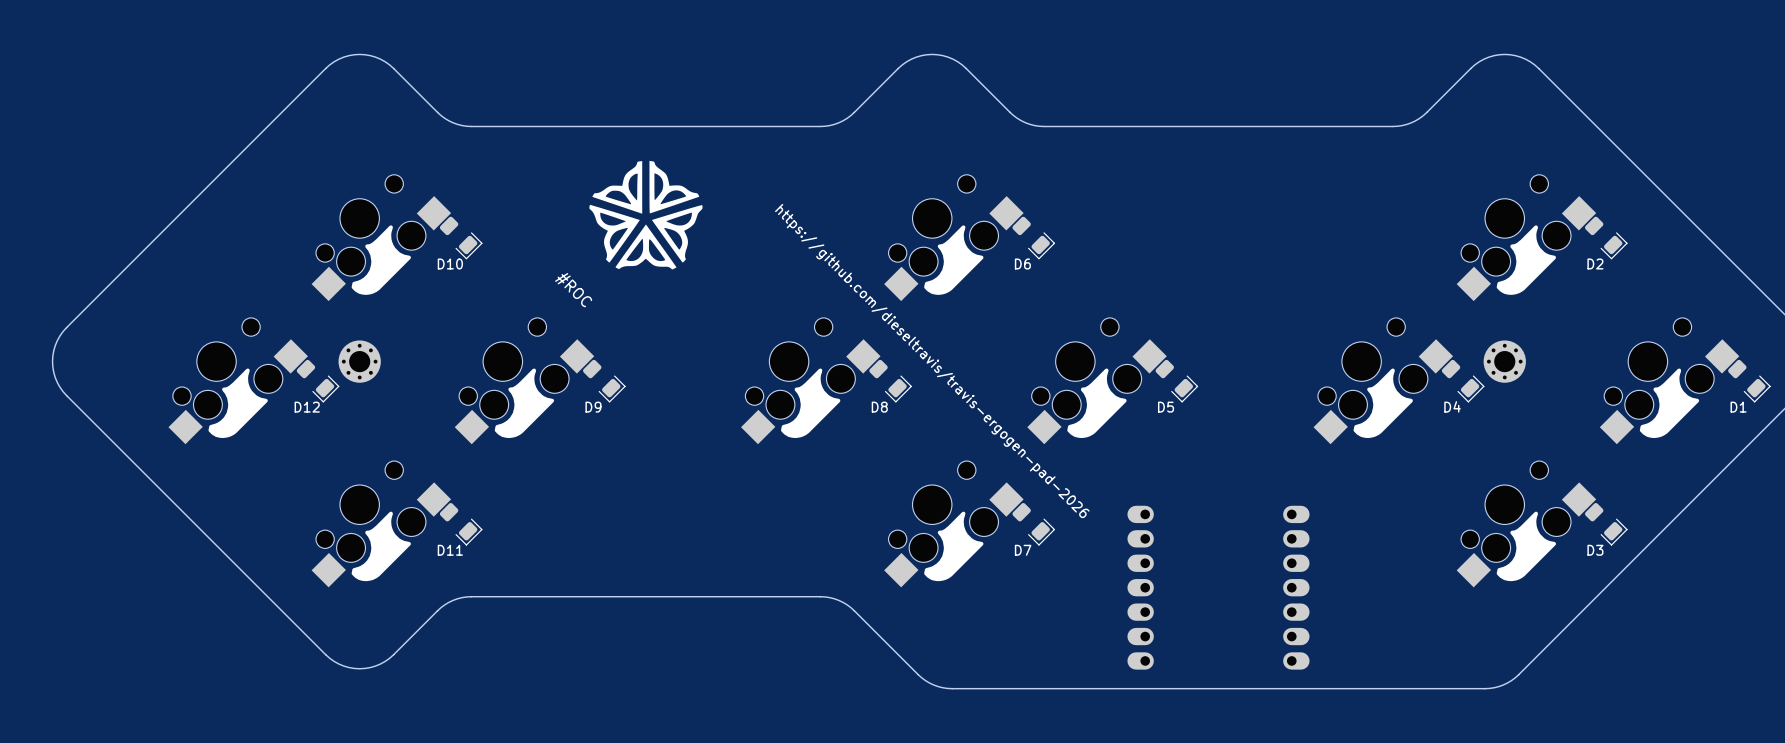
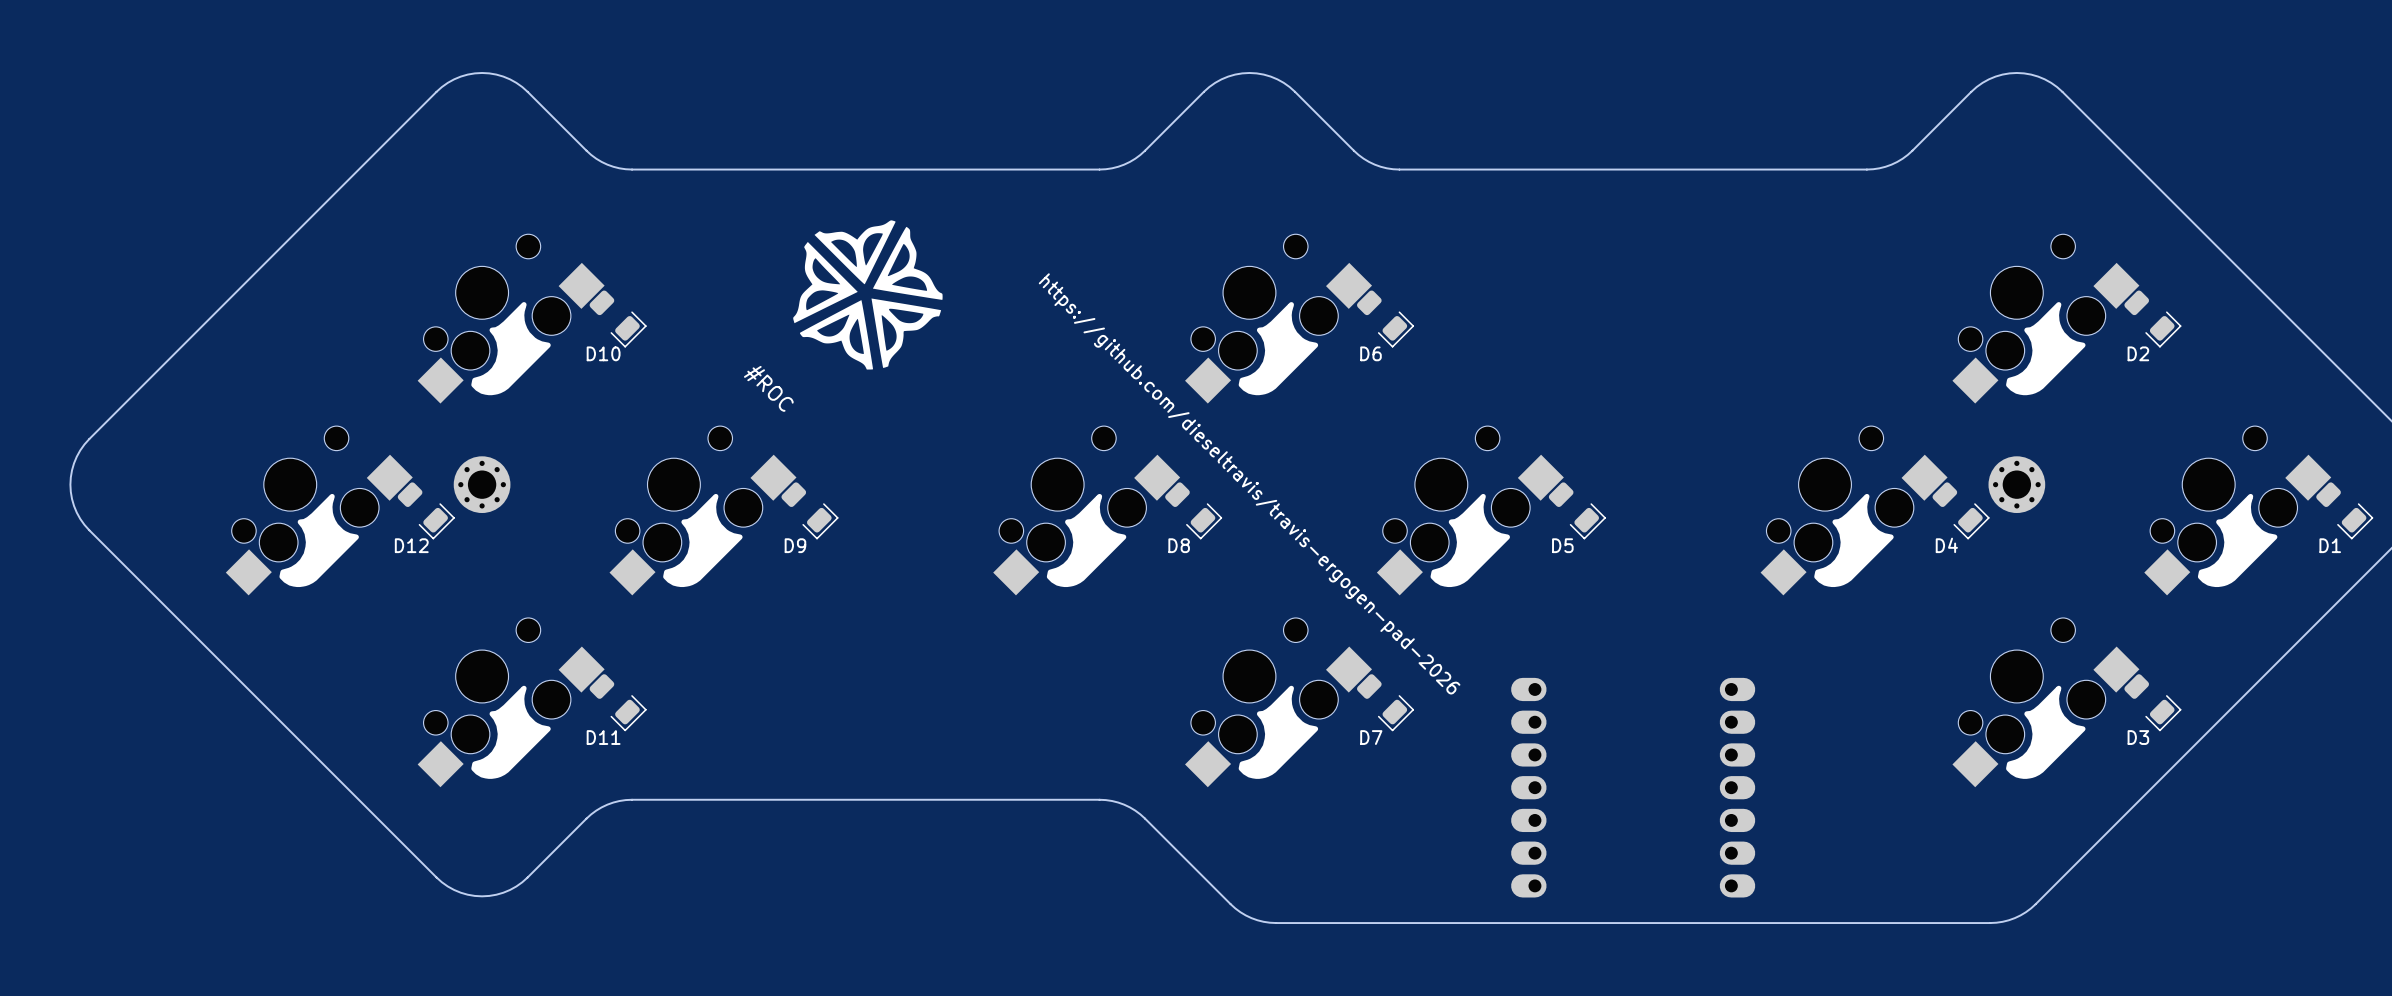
drawing shape: [589, 160, 703, 270] -> [793, 220, 943, 370]

